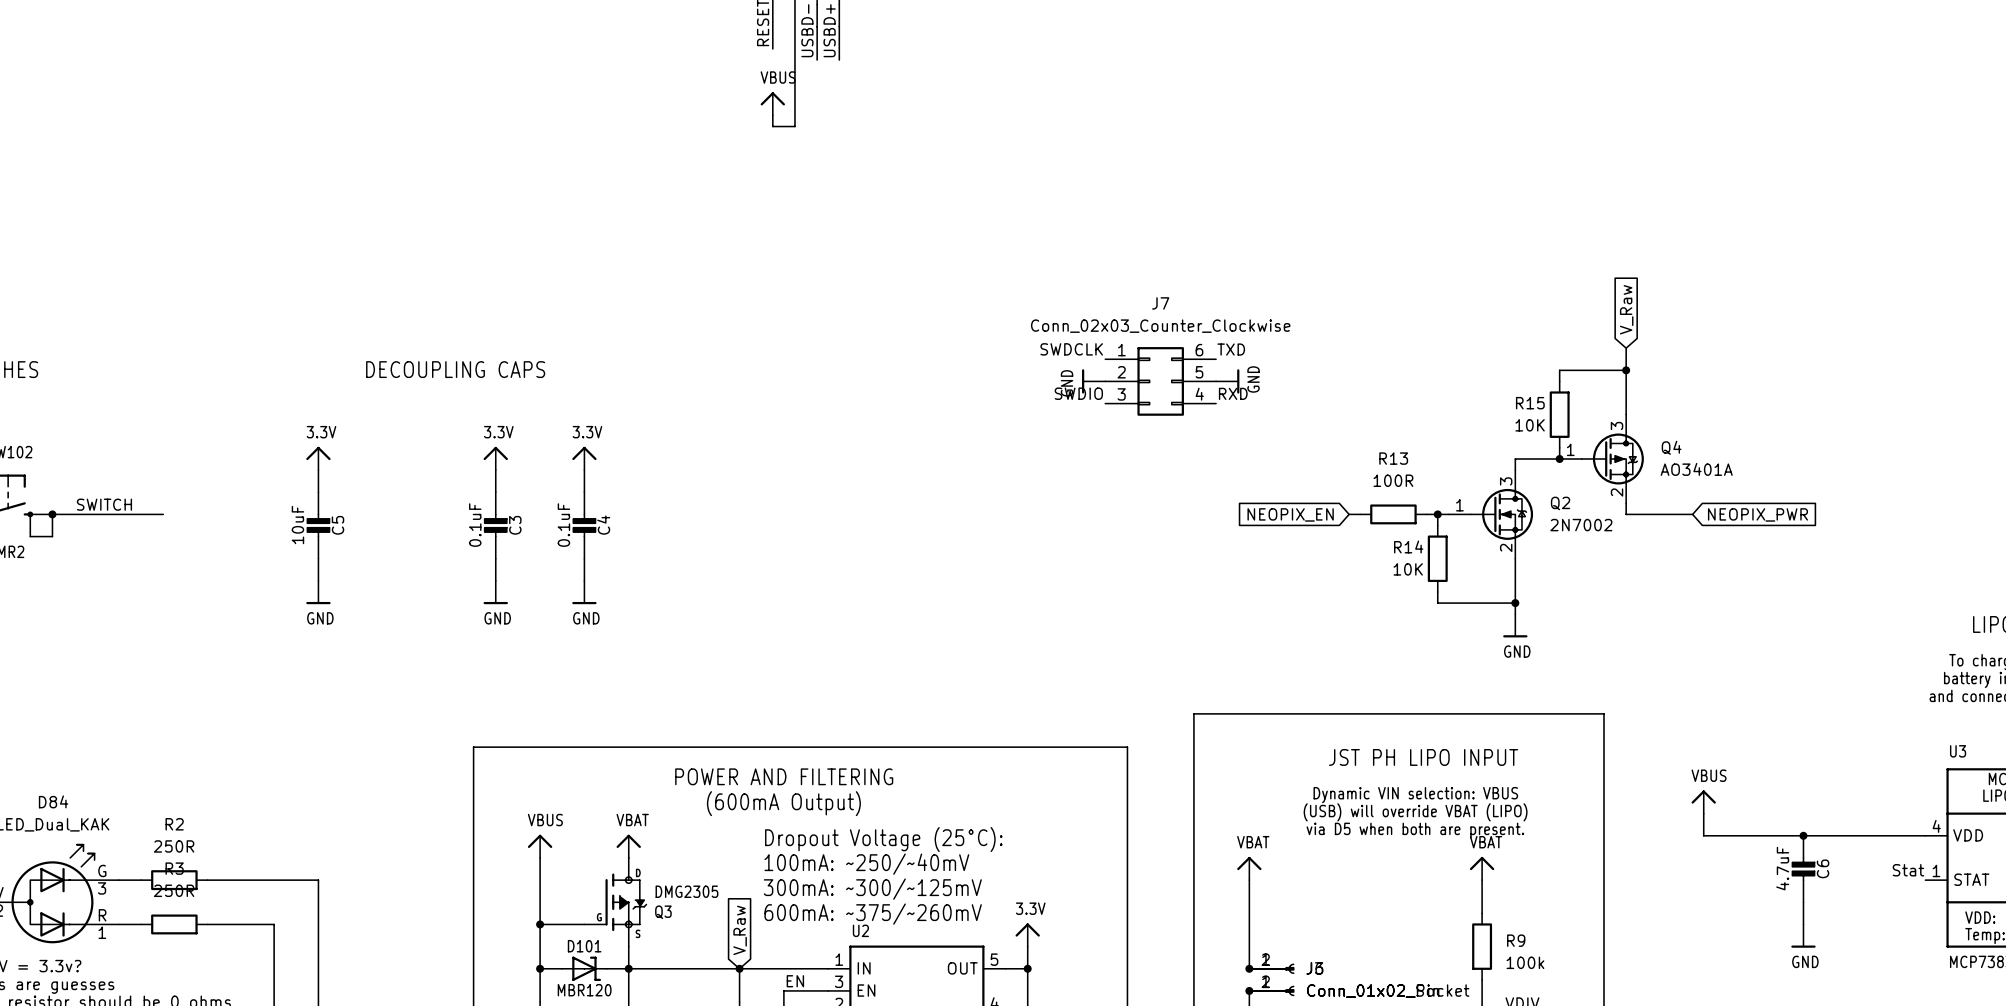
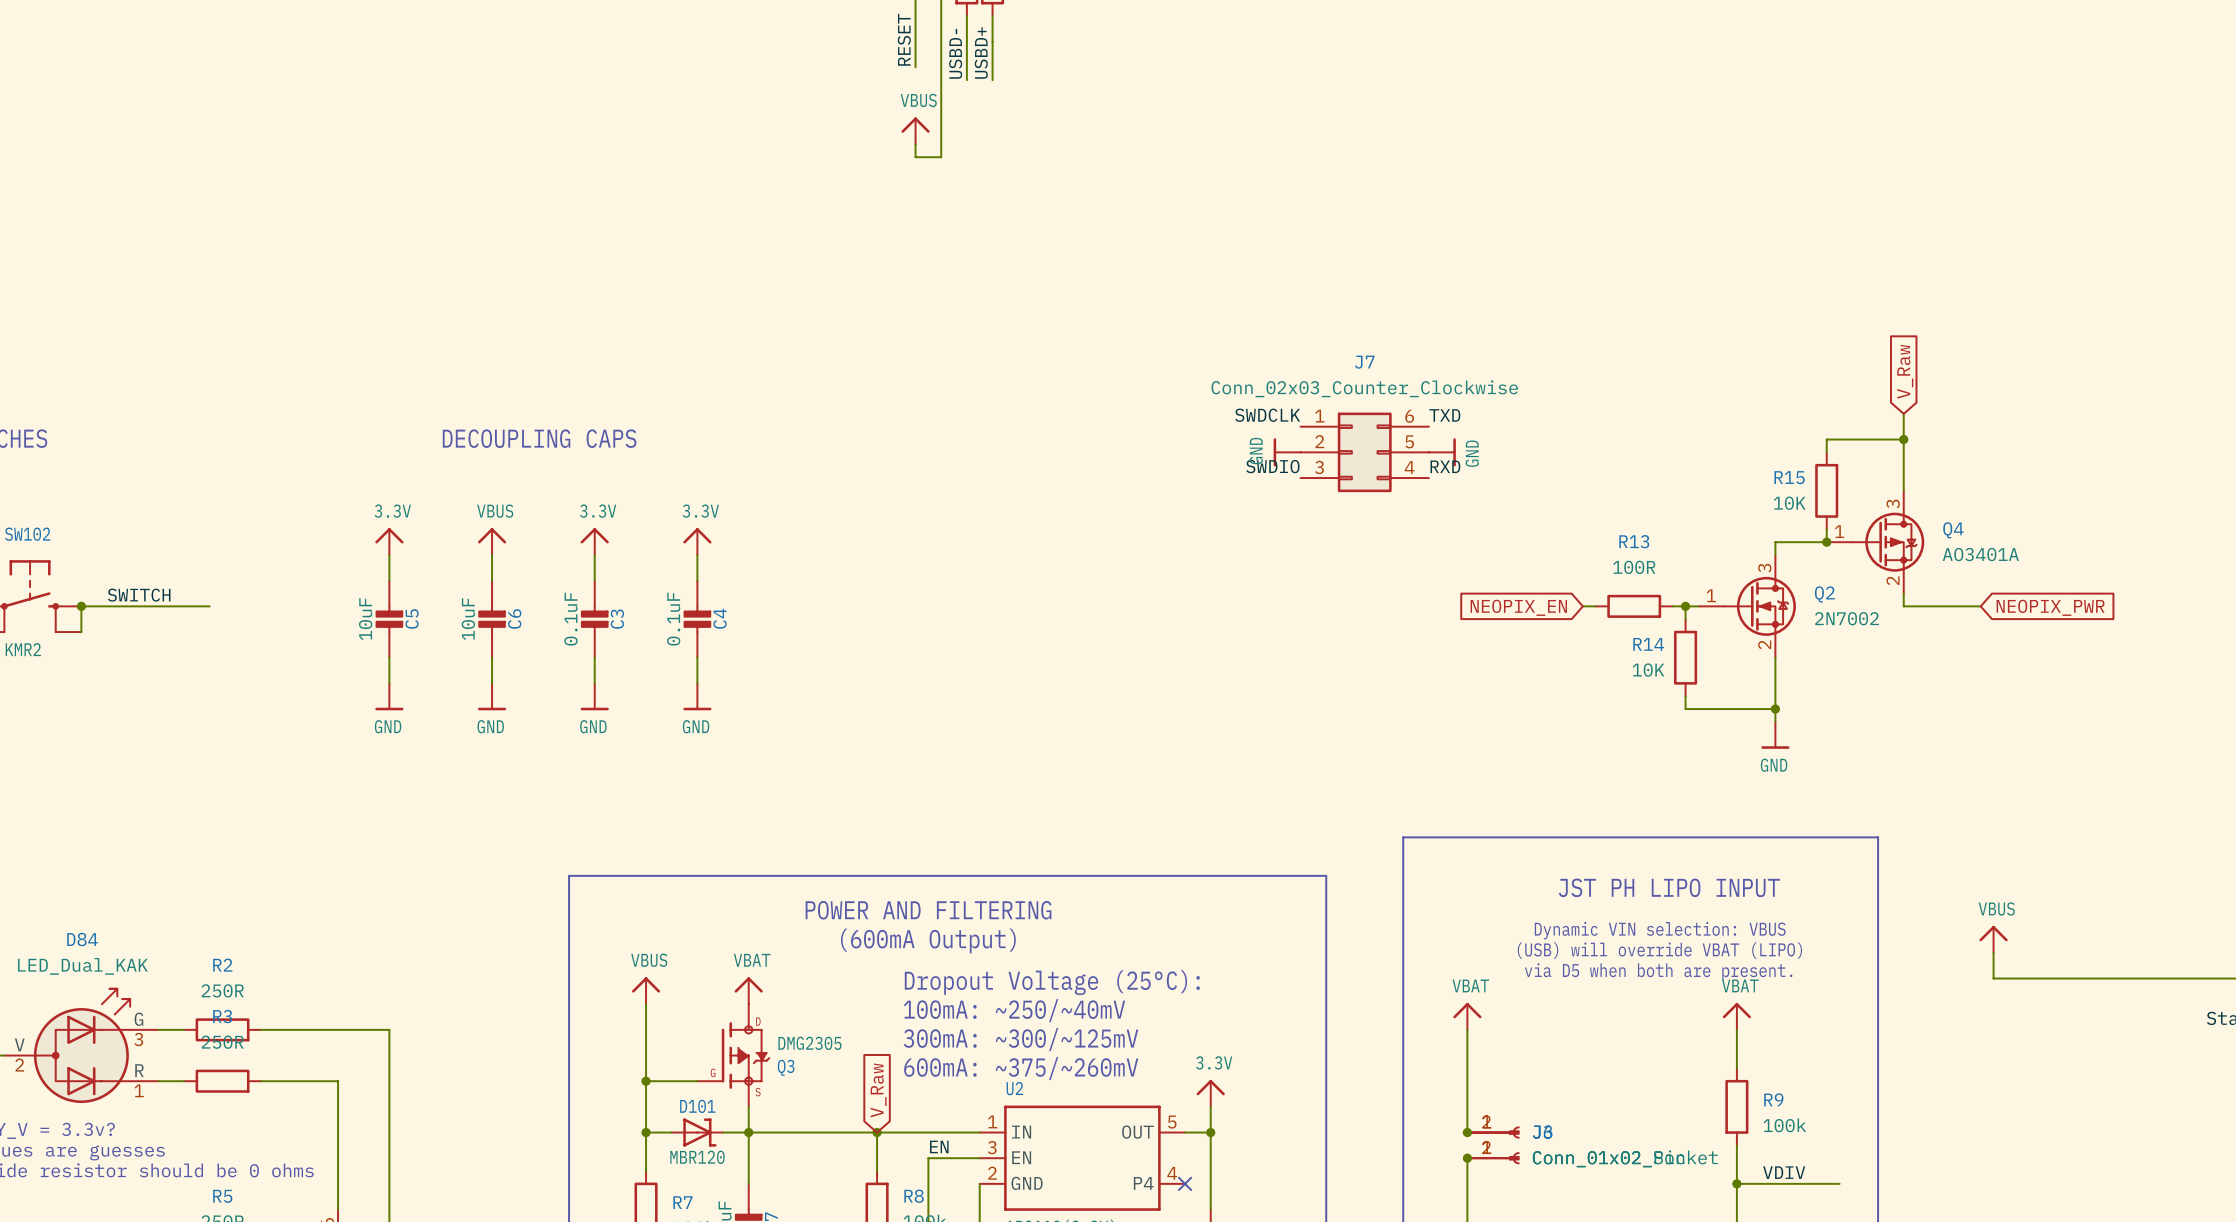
power symbol: none -> VBUS (492, 541)
wire: none -> (492, 555) (492, 580)
wire: none -> (492, 657) (492, 683)
power symbol: none -> GND (492, 696)
junction: (1803, 835) -> none
C6 value: 4.7uF (1782, 868) -> 10uF (468, 619)
C6 position: (1803, 869) -> (492, 619)
wire: (1803, 902) (1803, 924) -> none
power symbol: GND (1803, 936) -> none

